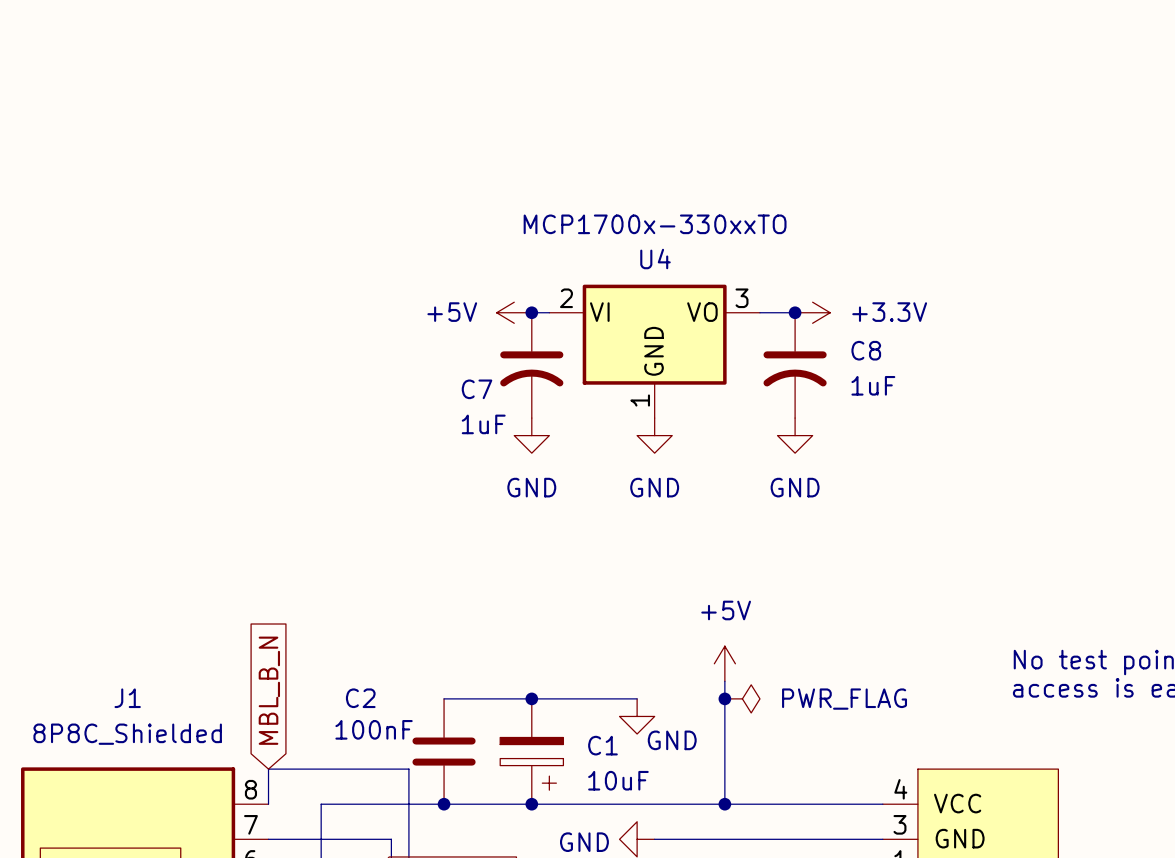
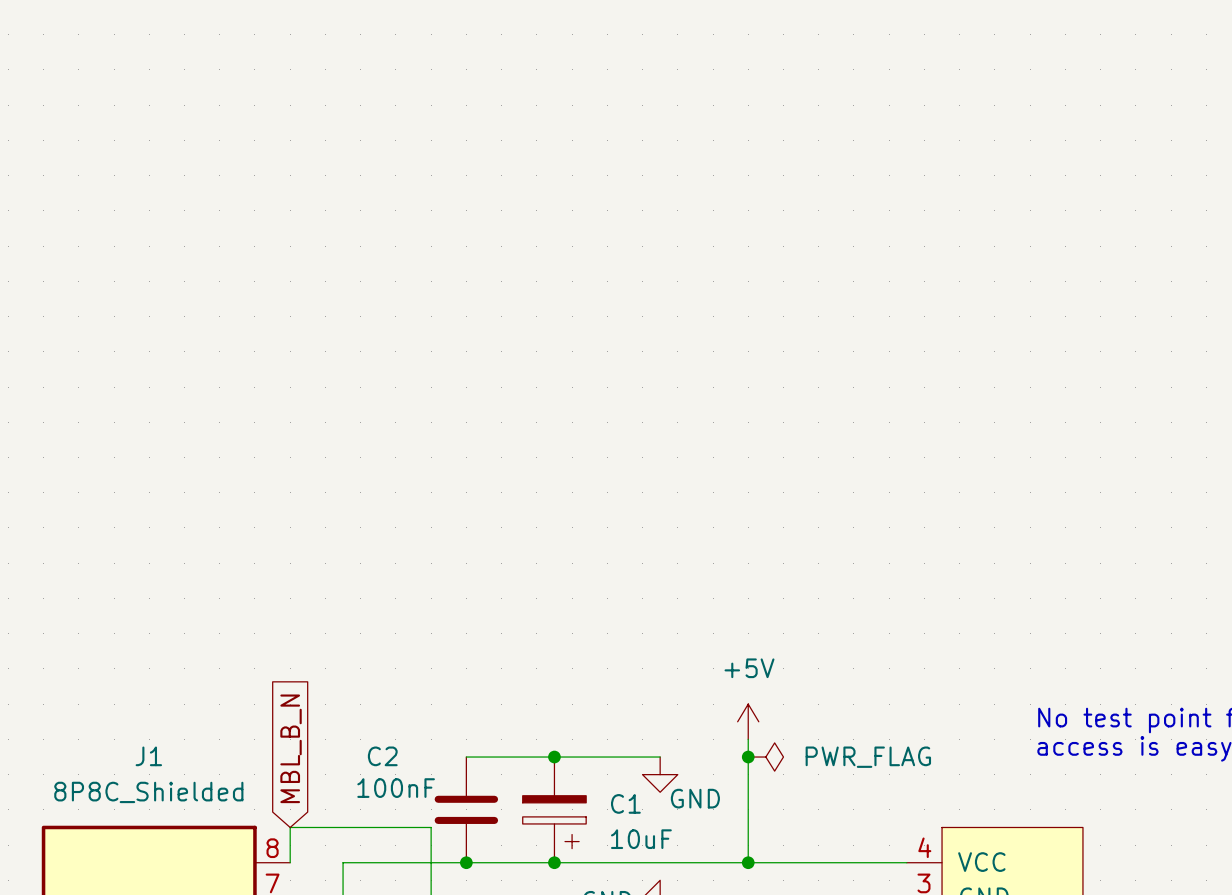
power symbol: +5V (514, 312) -> none
wire: (531, 312) (549, 312) -> none
junction: (531, 312) -> none
wire: (759, 312) (795, 312) -> none
junction: (795, 312) -> none
power symbol: +3.3V (812, 312) -> none
U4: MCP1700x-330xxTO (654, 351) -> none
C7: 1uF (531, 365) -> none
C8: 1uF (795, 365) -> none
power symbol: GND (531, 435) -> none
power symbol: GND (654, 435) -> none
power symbol: GND (795, 435) -> none

